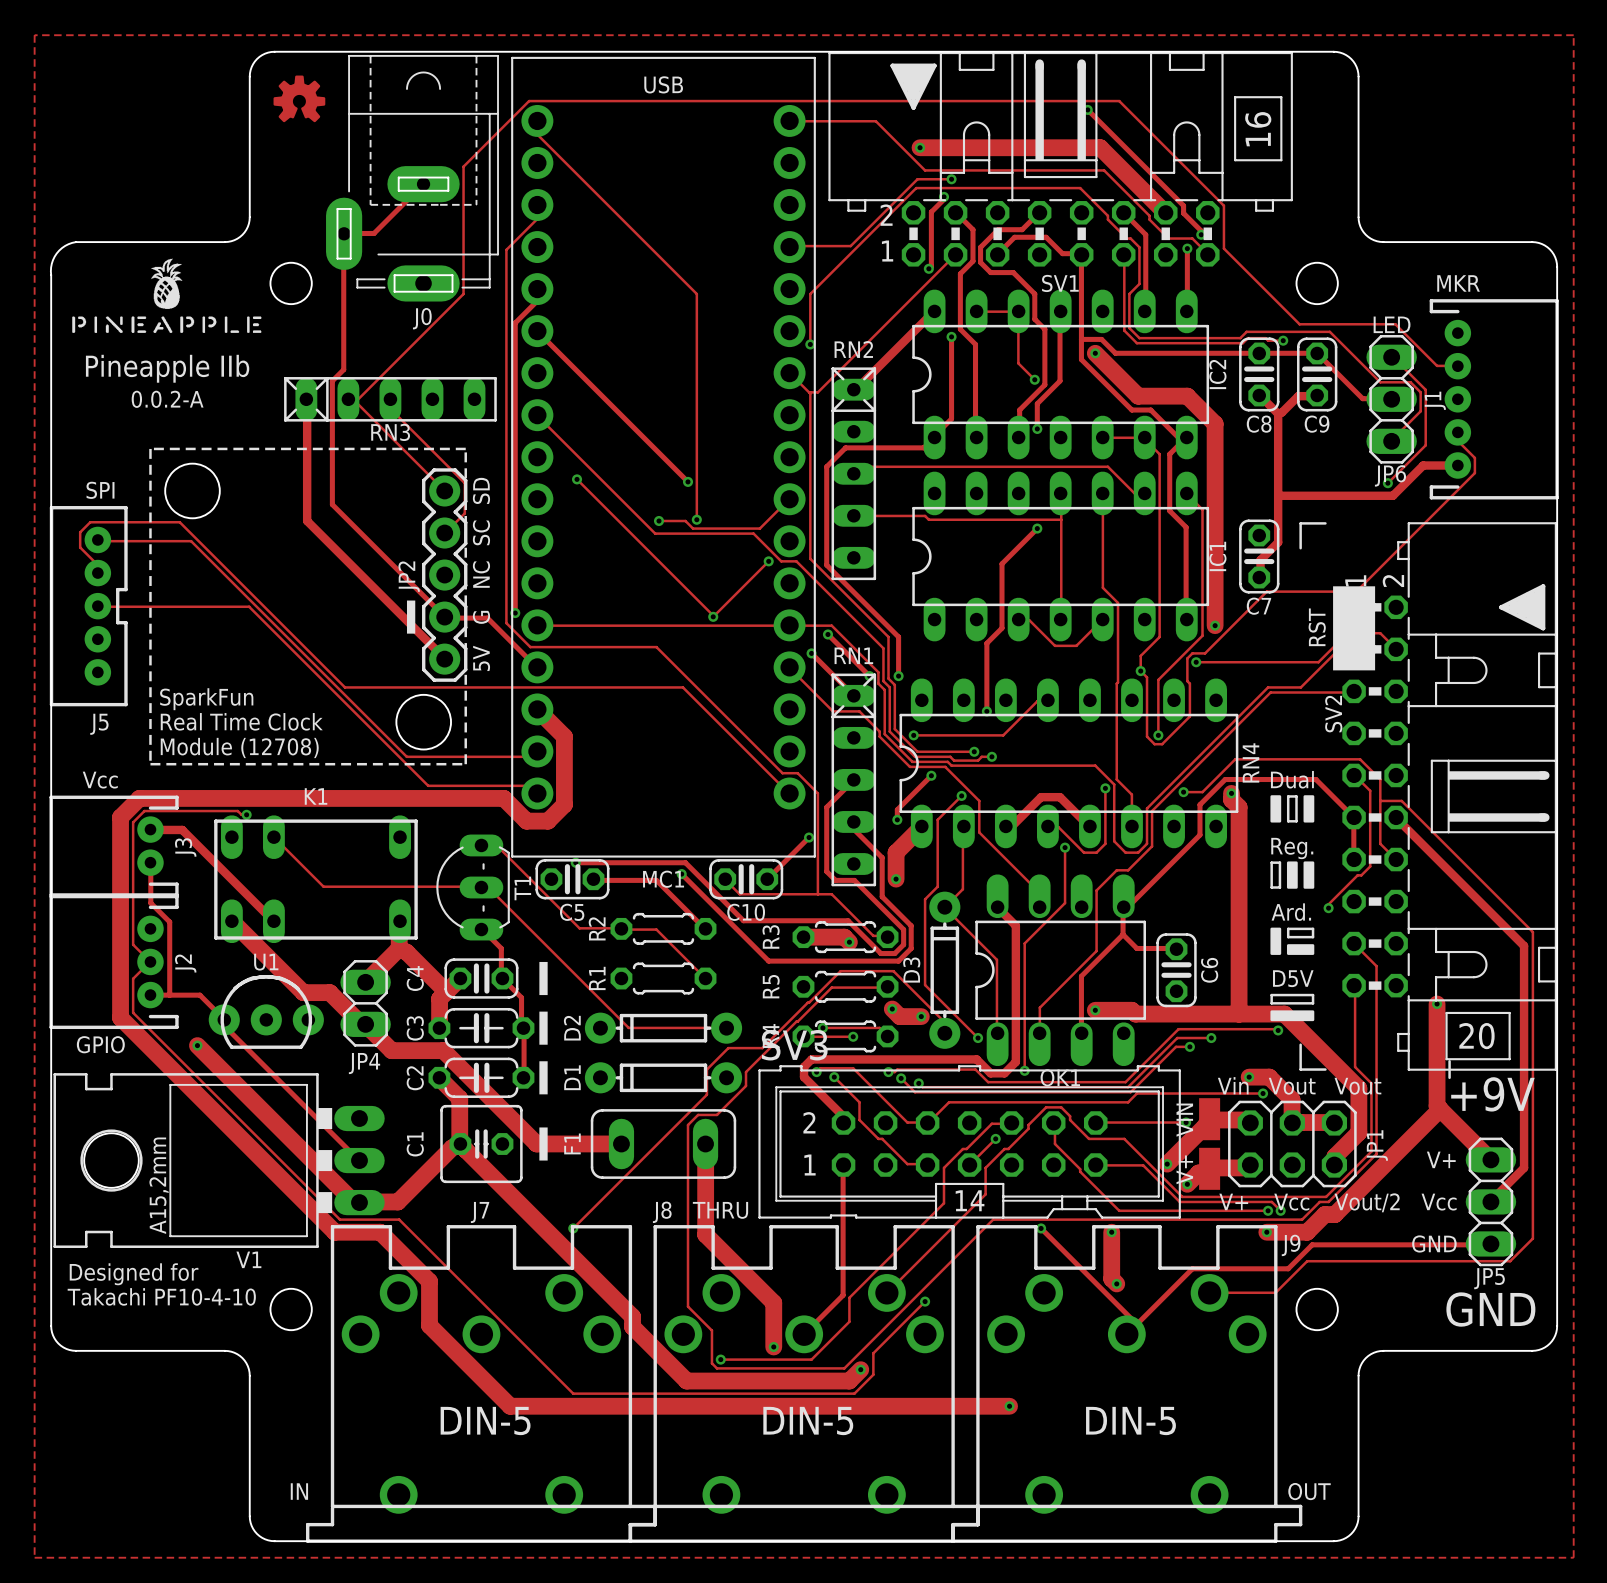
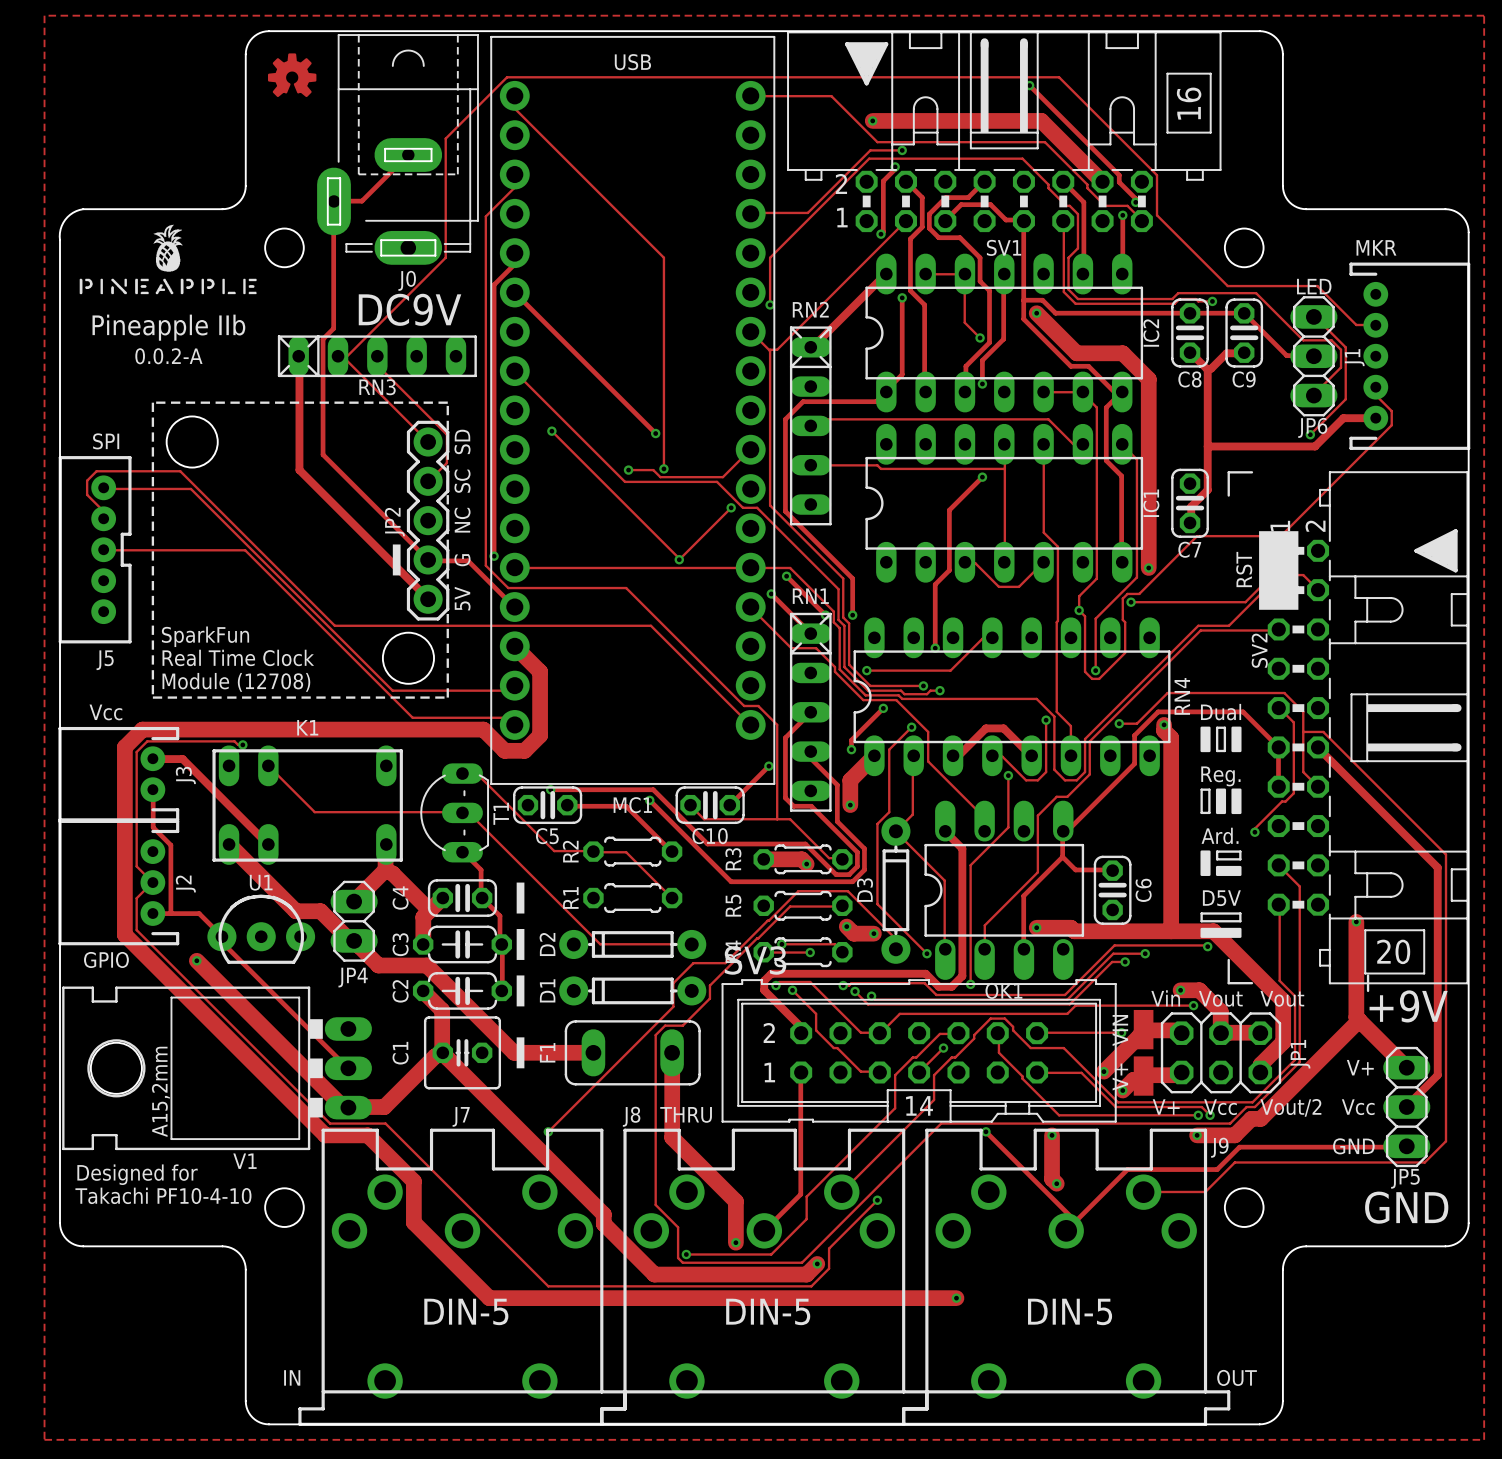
text: none -> DC9V (410, 309)

